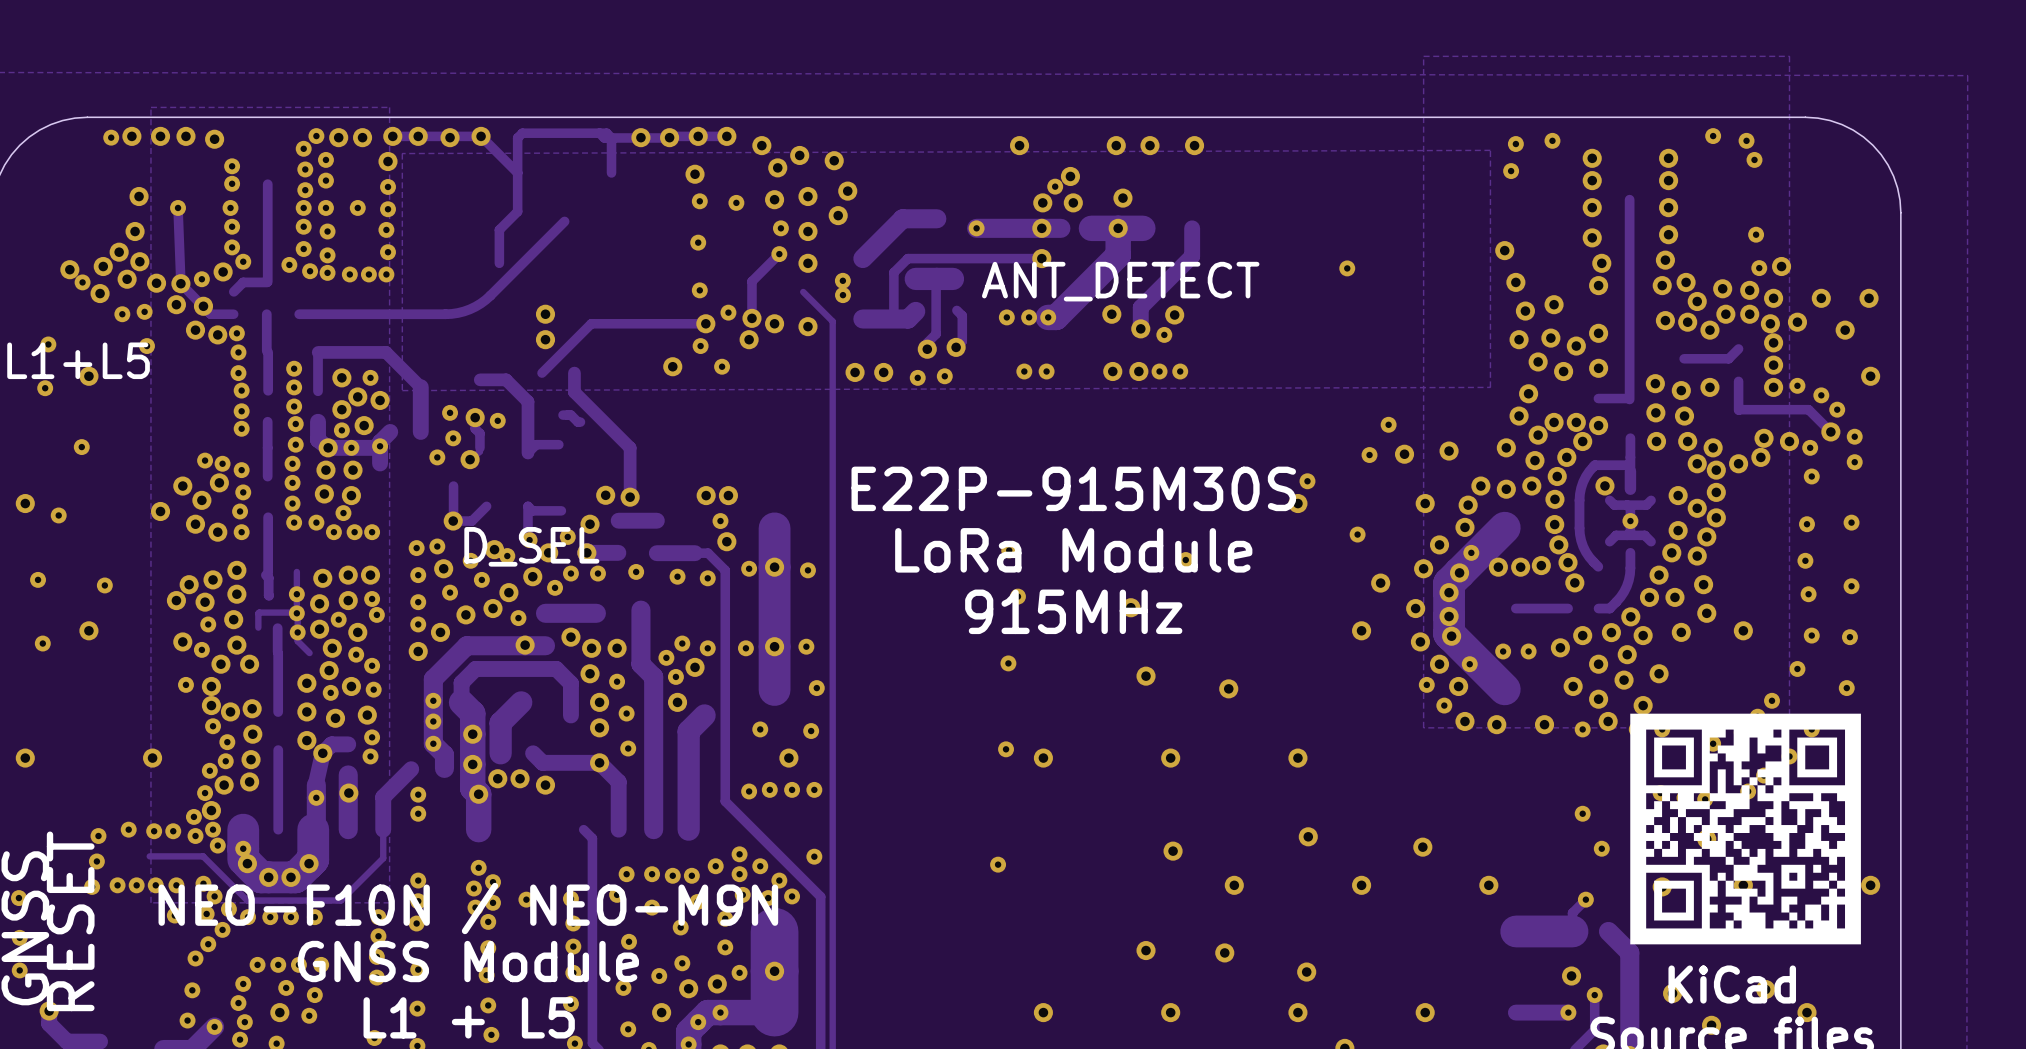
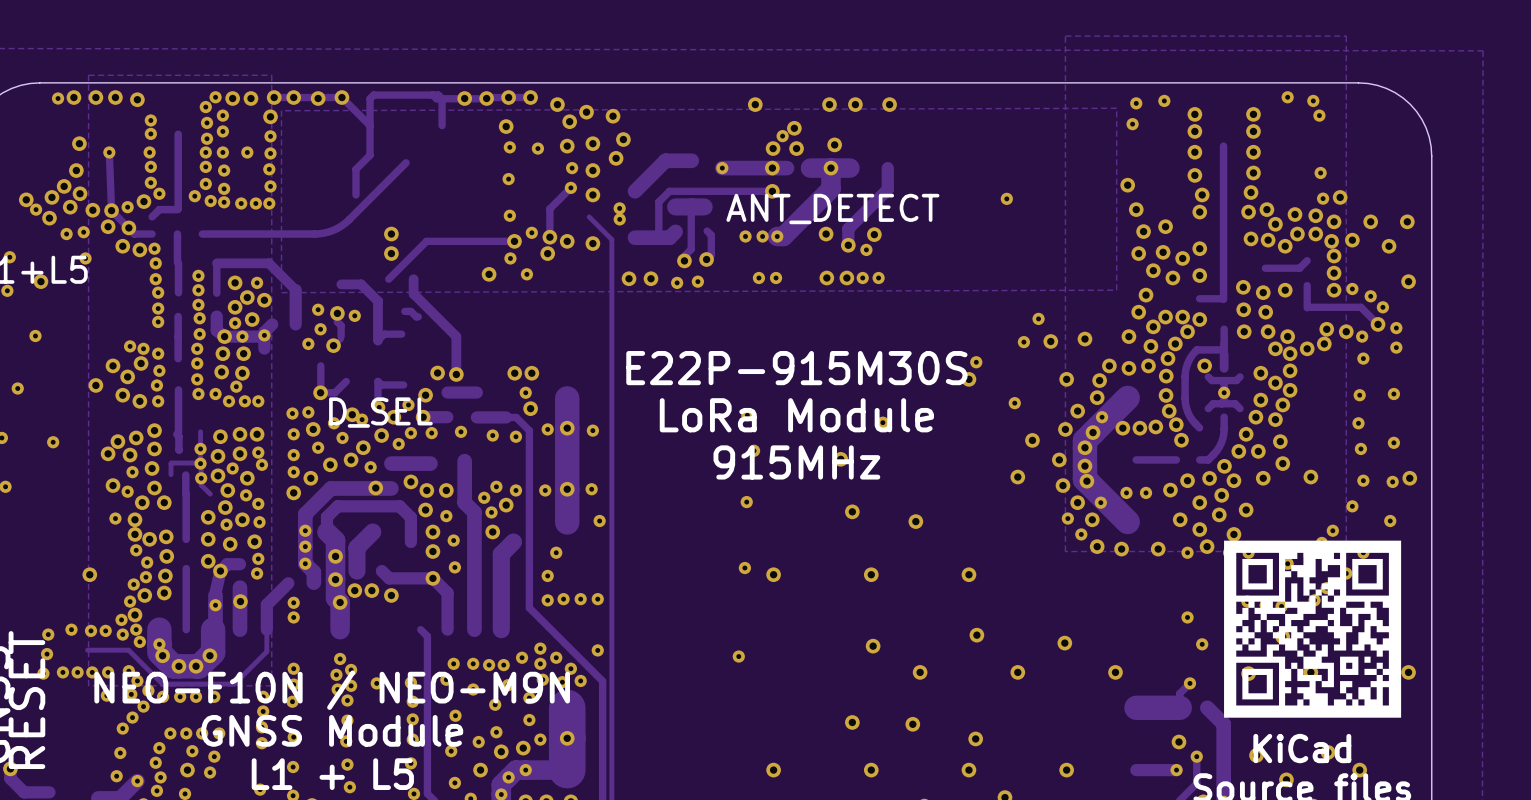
via: (88, 630) -> none
via: none -> (1409, 478)
via position: (811, 731) -> (547, 575)
via: (788, 758) -> none

